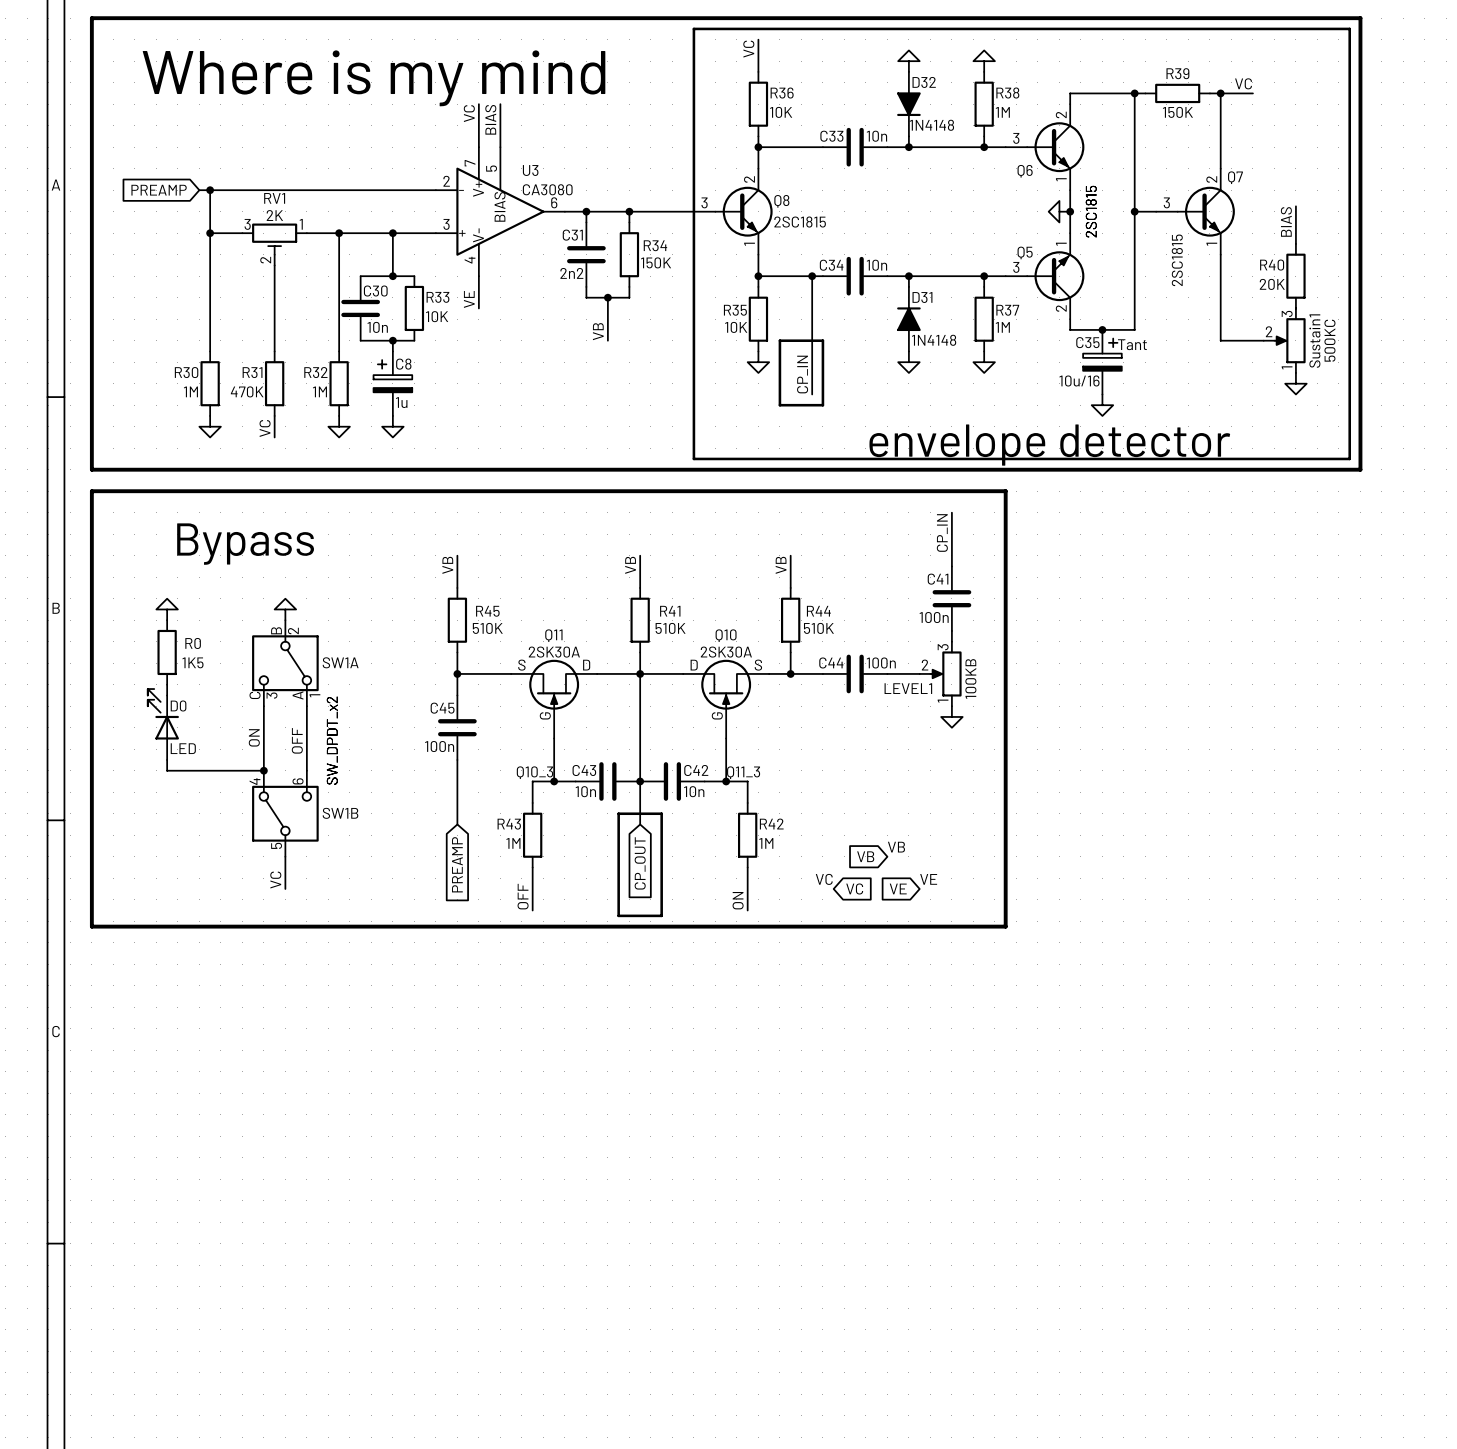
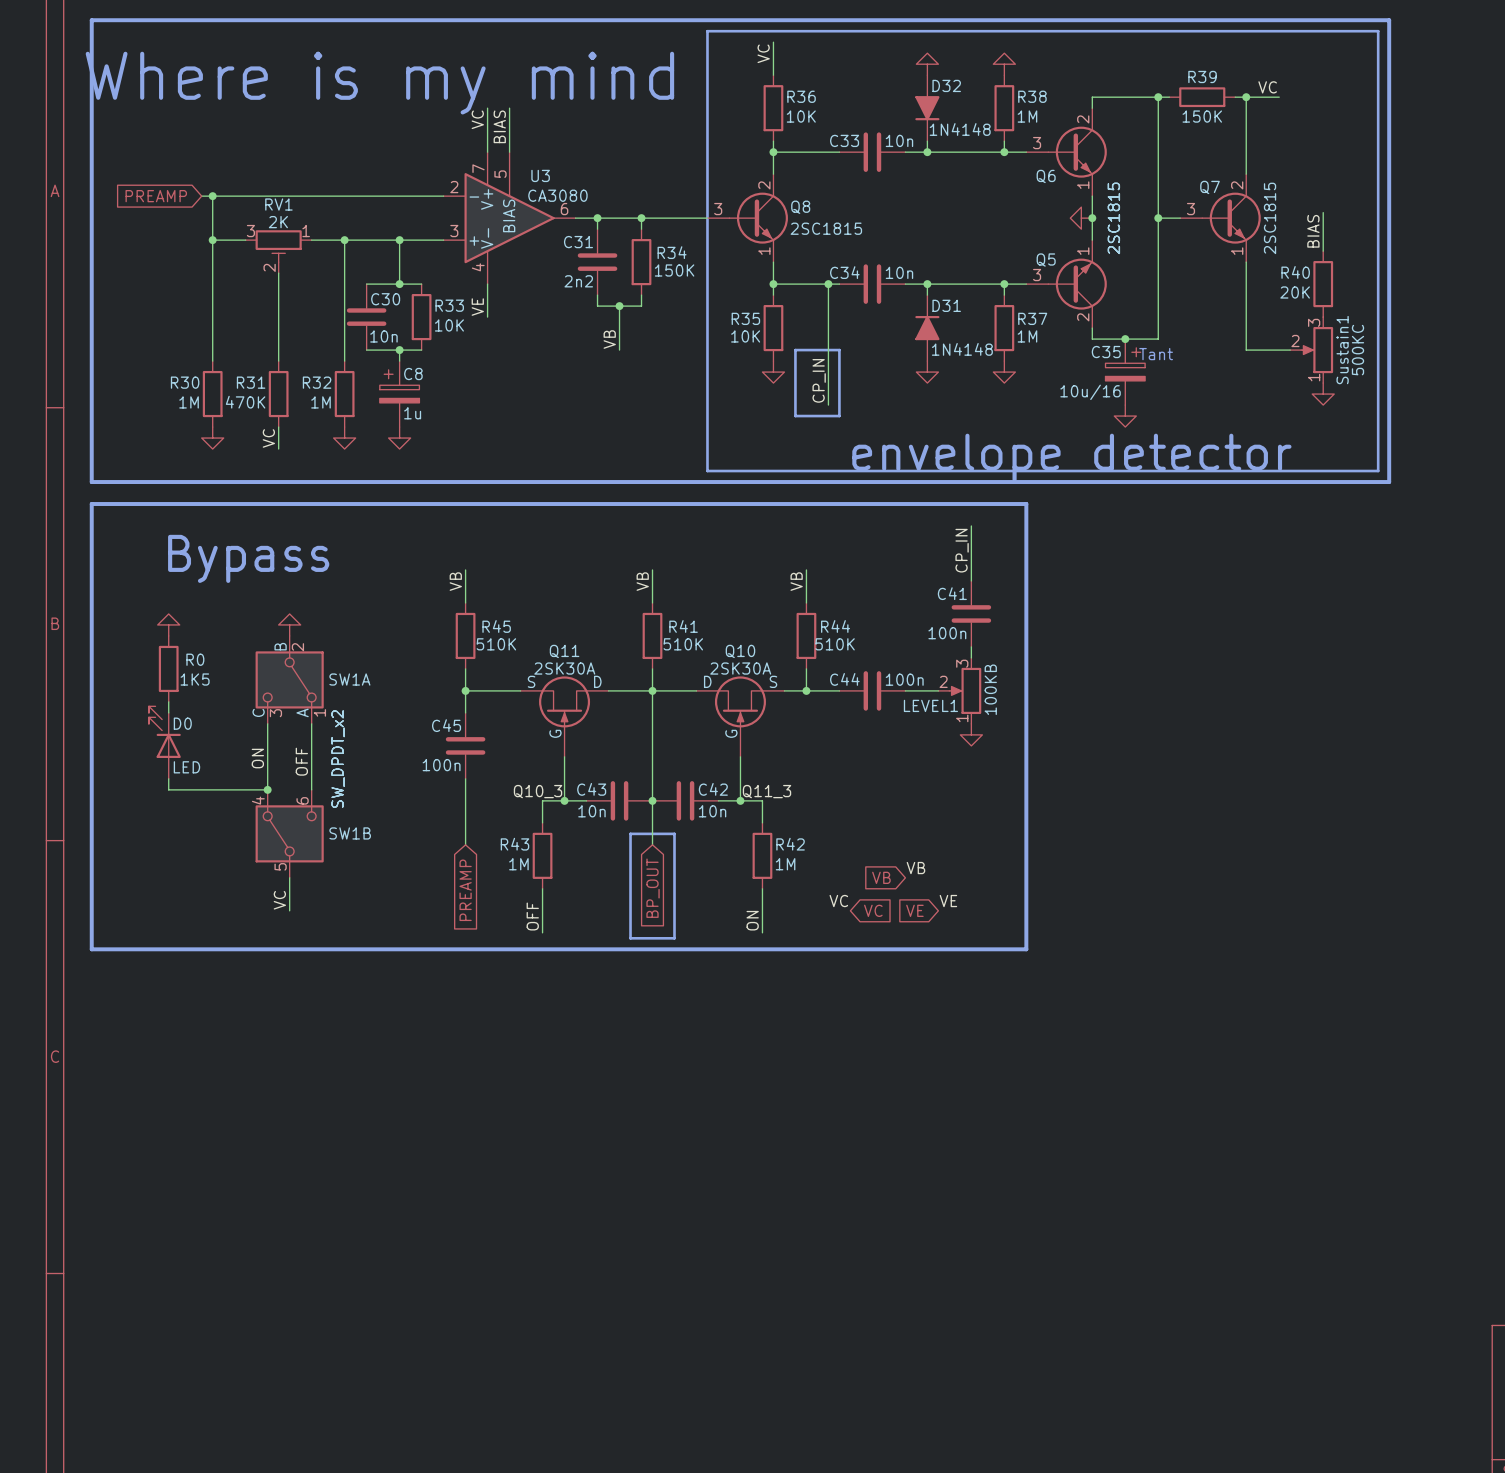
Q7 name position: Q7 (1235, 177) -> Q7 (1209, 187)
Q7 value position: 2SC1815 (1177, 260) -> 2SC1815 (1270, 218)
global label: CP_OUT (640, 863) -> BP_OUT (653, 888)

